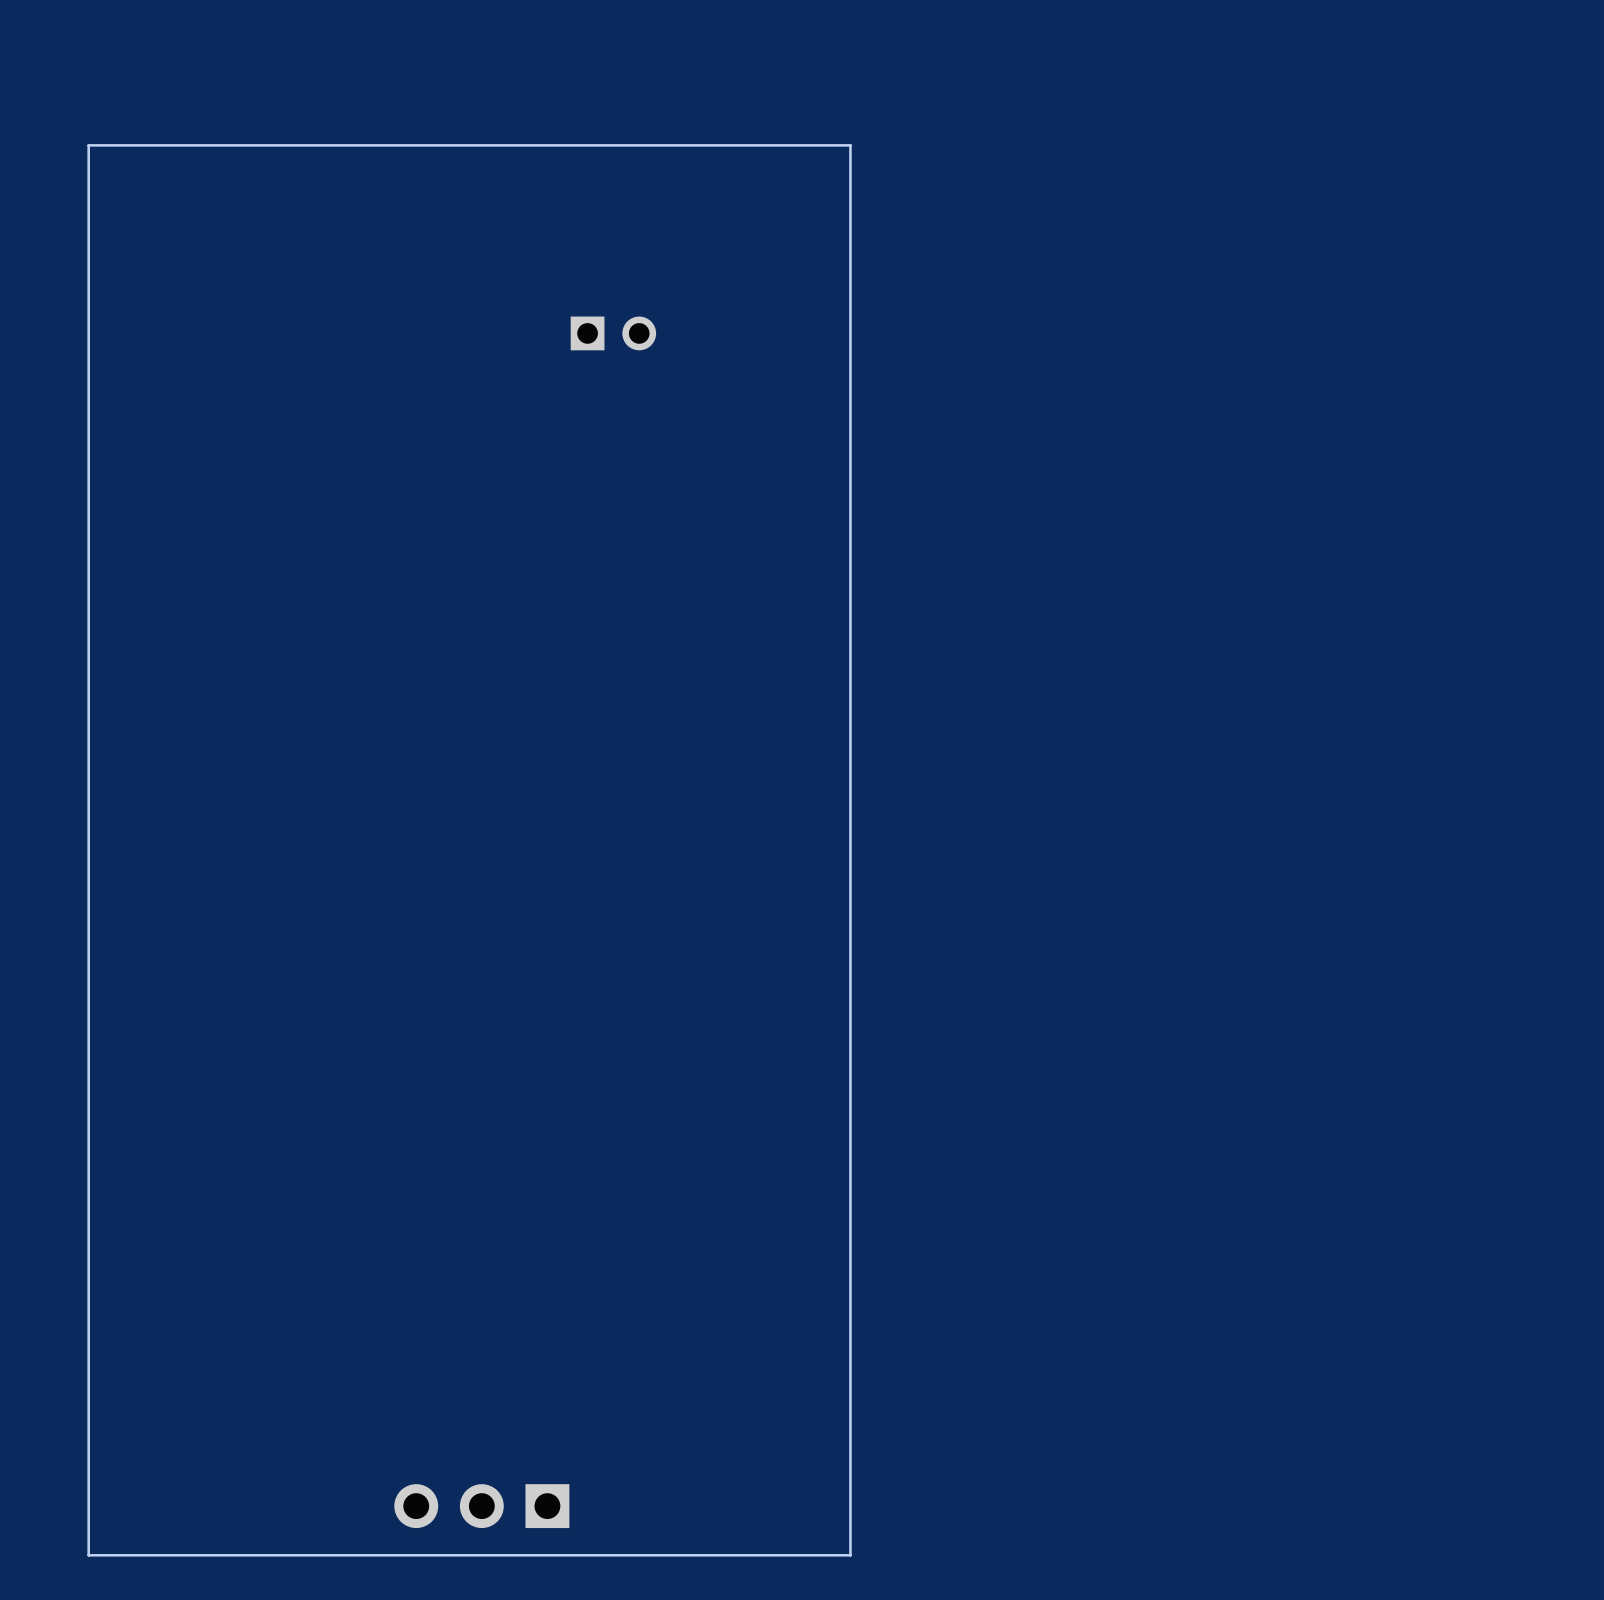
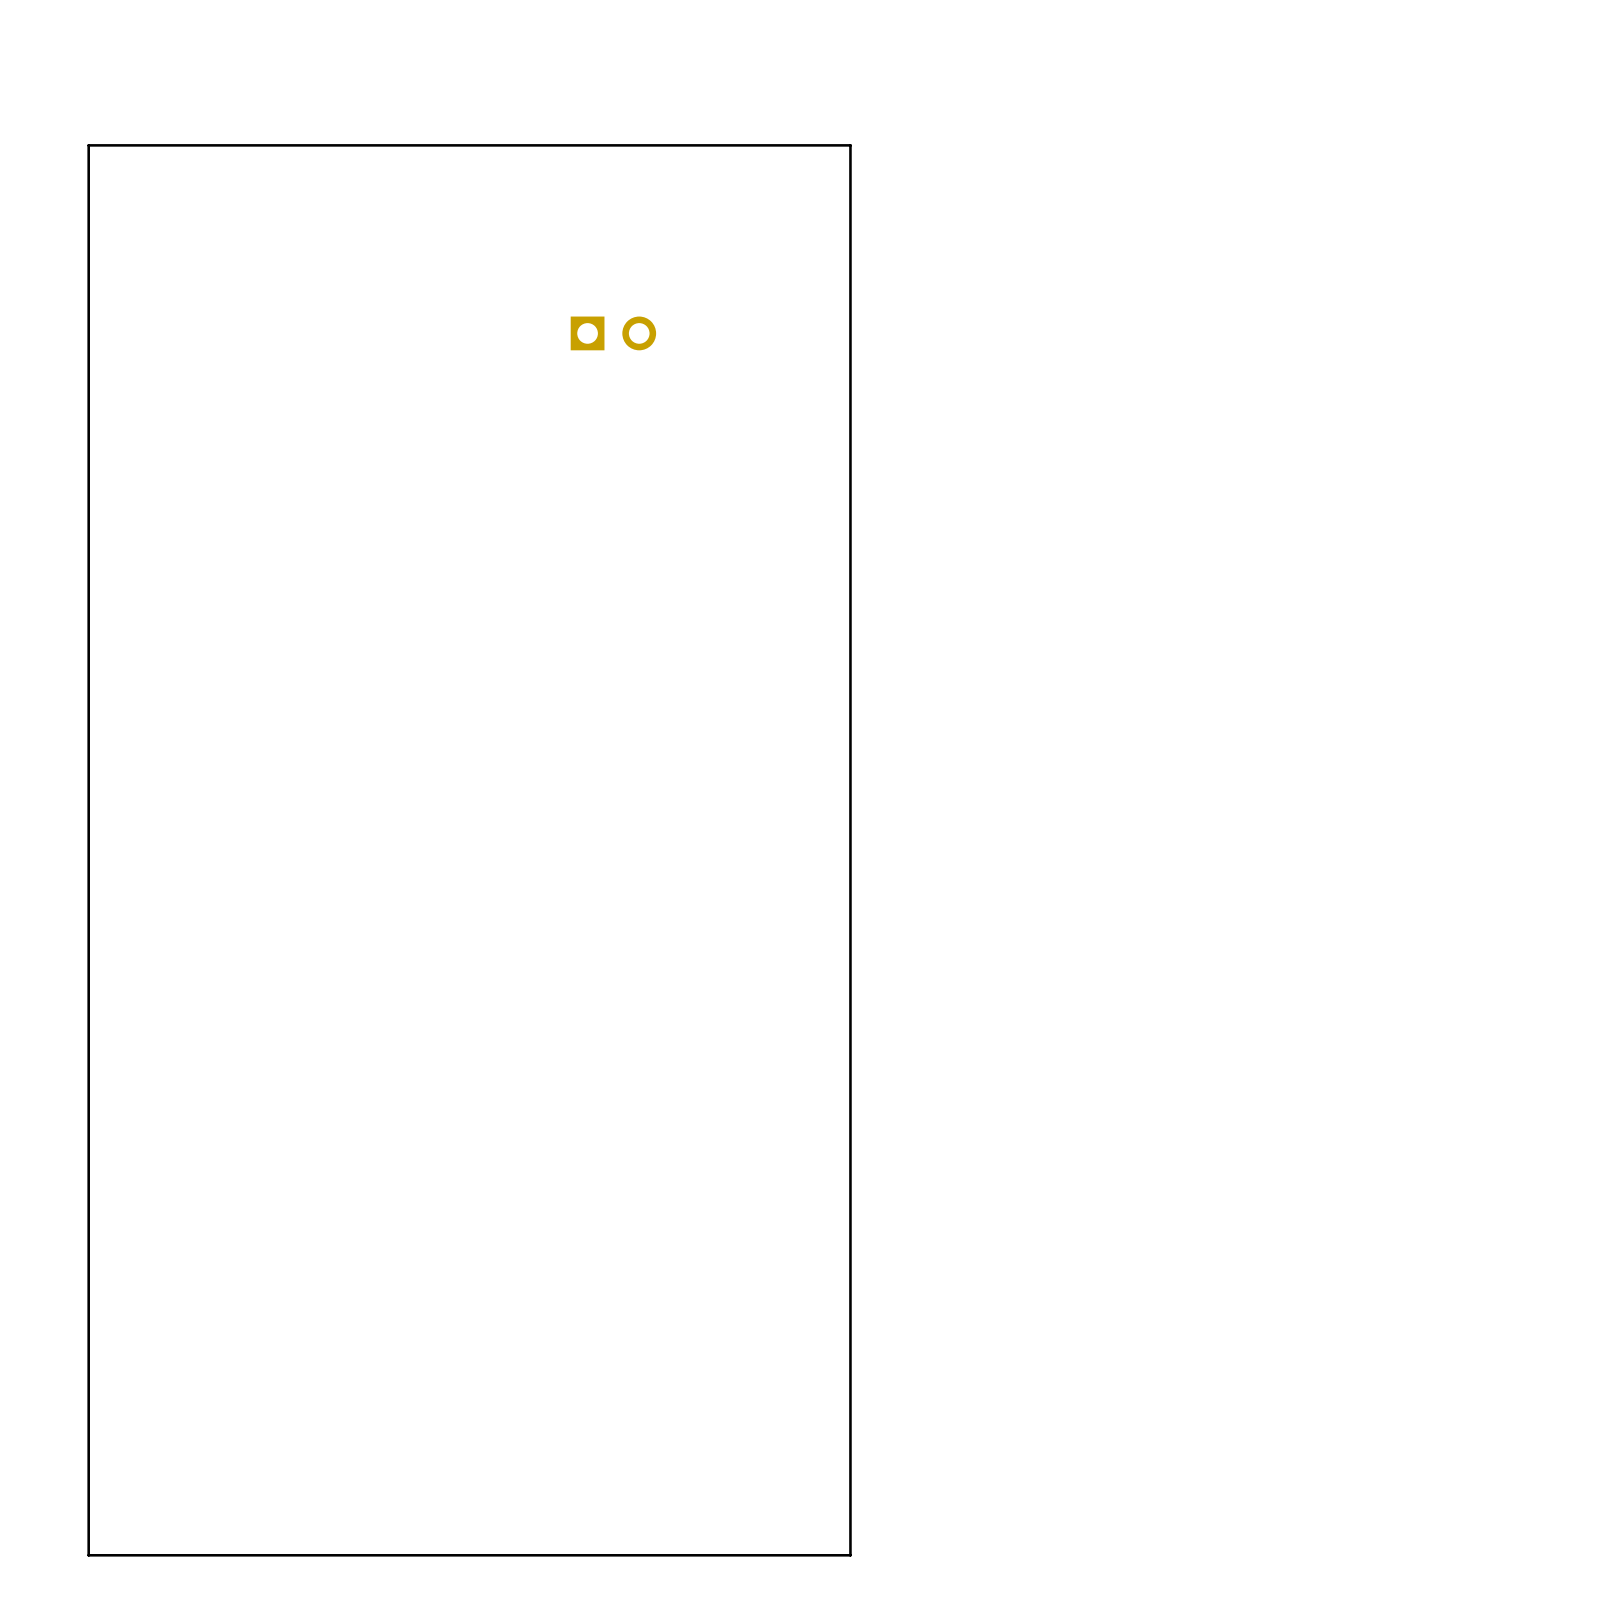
part: (481, 1506) -> none

